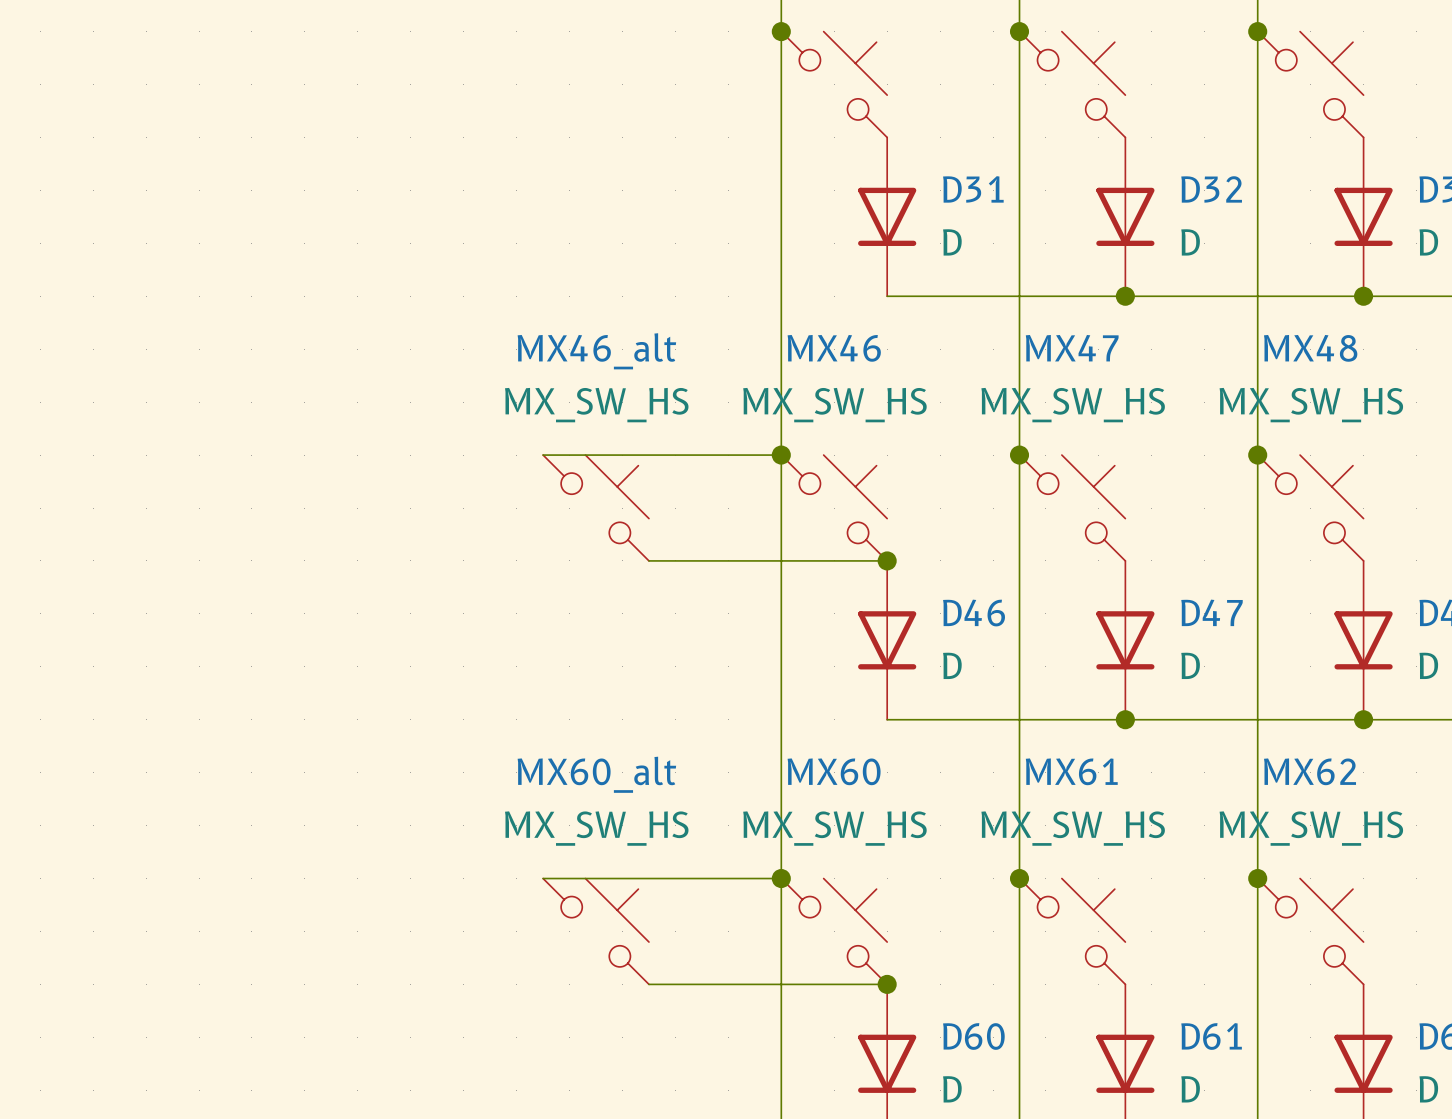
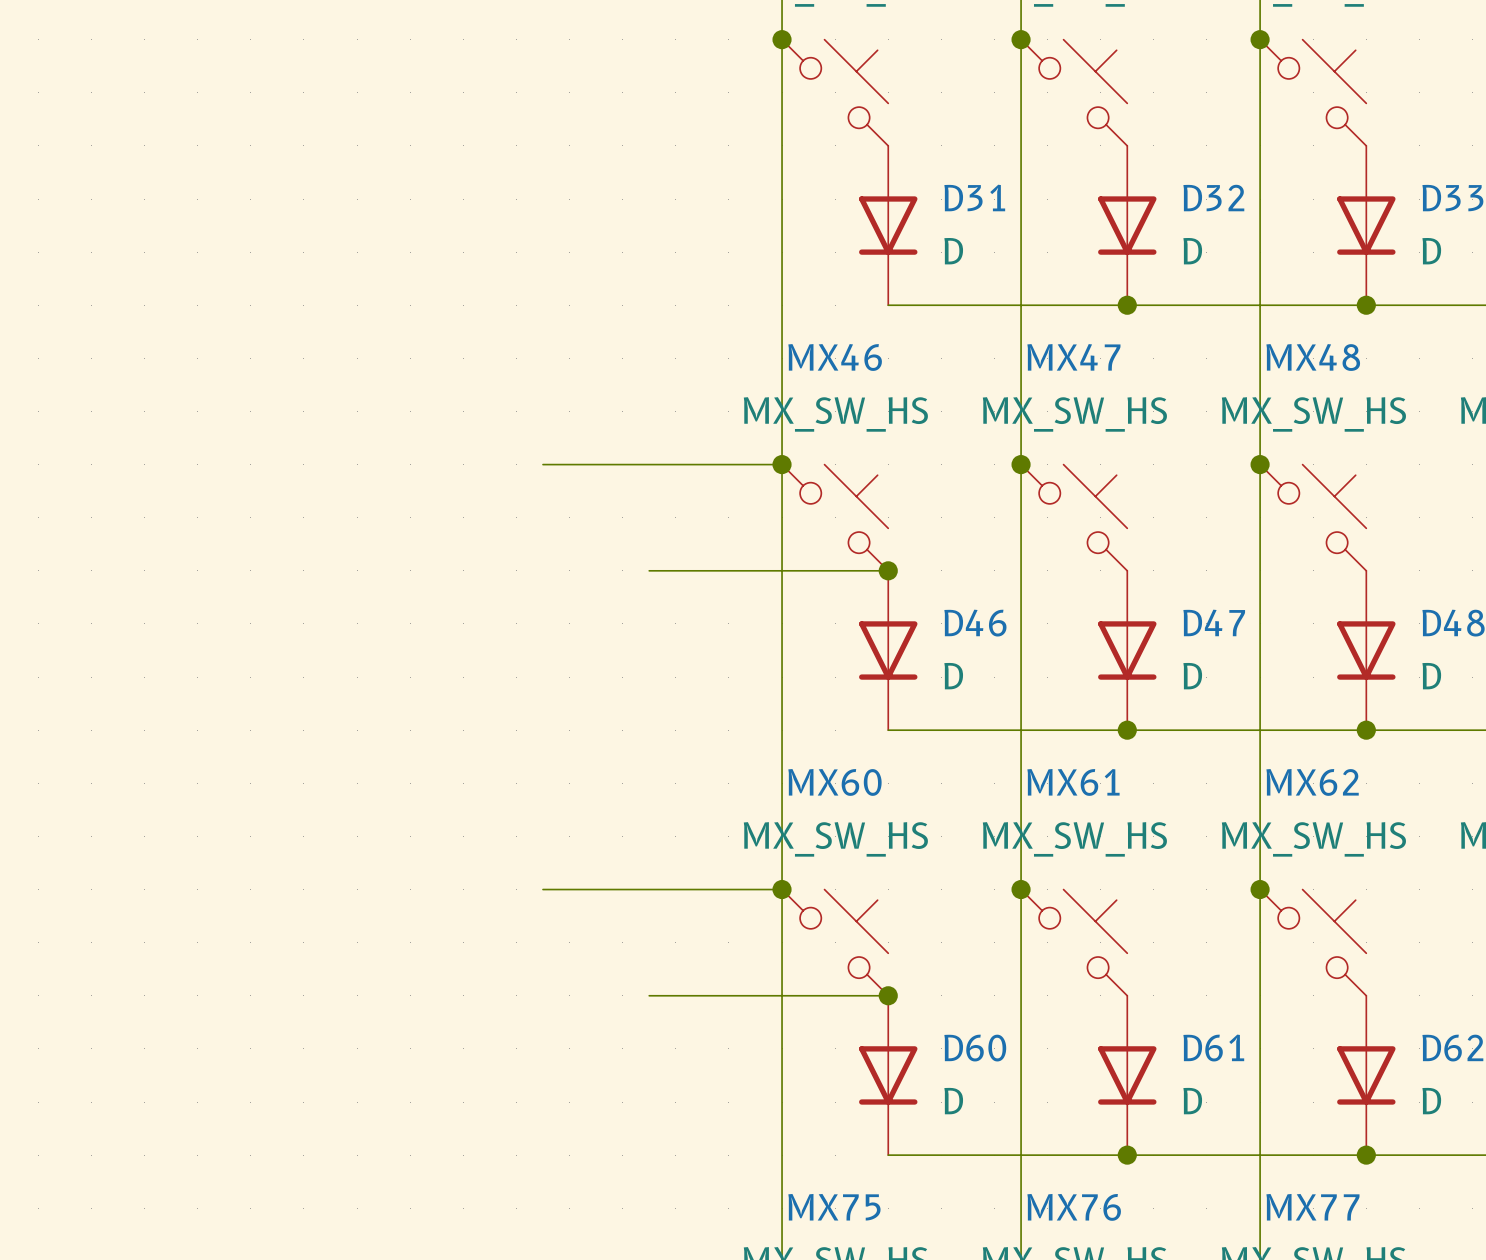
MX46_alt: MX_SW_HS (596, 508) -> none
MX60_alt: MX_SW_HS (596, 931) -> none

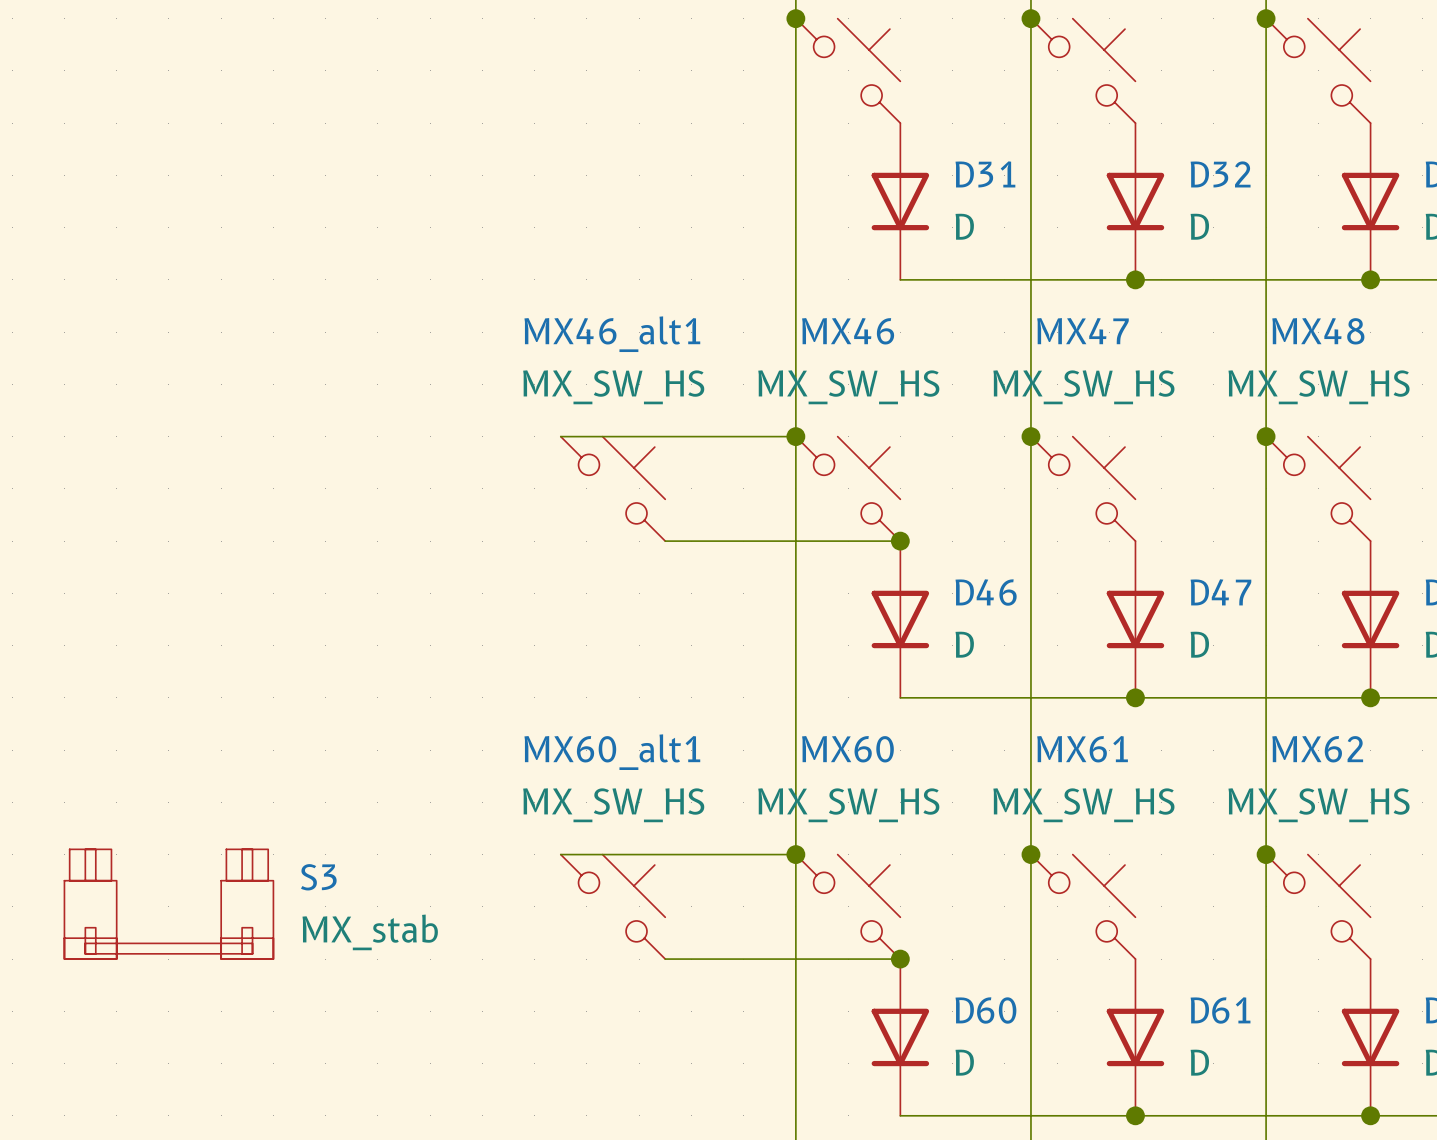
MX46_alt1: none -> MX_SW_HS (613, 488)
S3: none -> MX_stab (168, 904)
MX60_alt1: none -> MX_SW_HS (613, 906)

